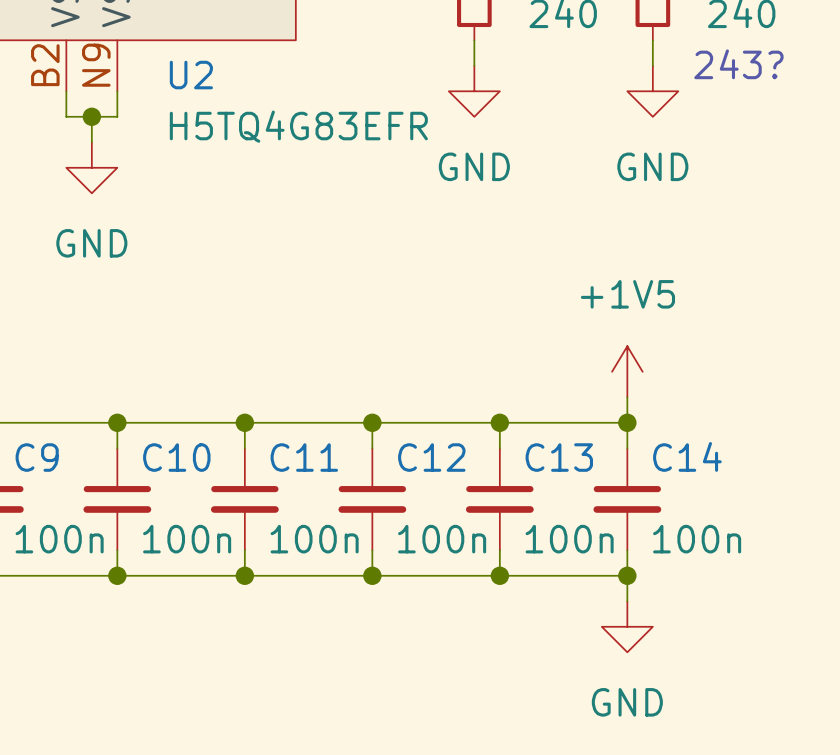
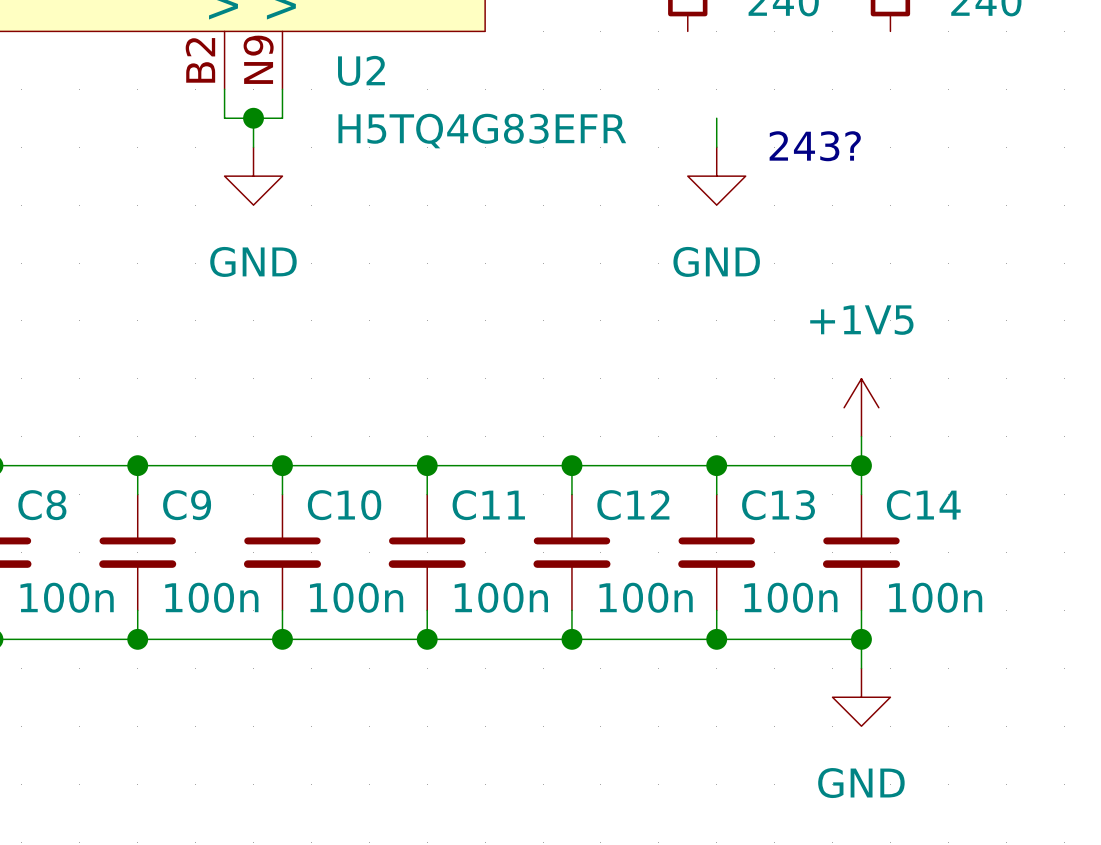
wire: (474, 40) (474, 65) -> (716, 118) (716, 147)
wire: (652, 40) (652, 65) -> none
text position: 243? (738, 64) -> 243? (815, 146)
power symbol position: GND (474, 91) -> GND (716, 176)
power symbol: GND (652, 91) -> none

